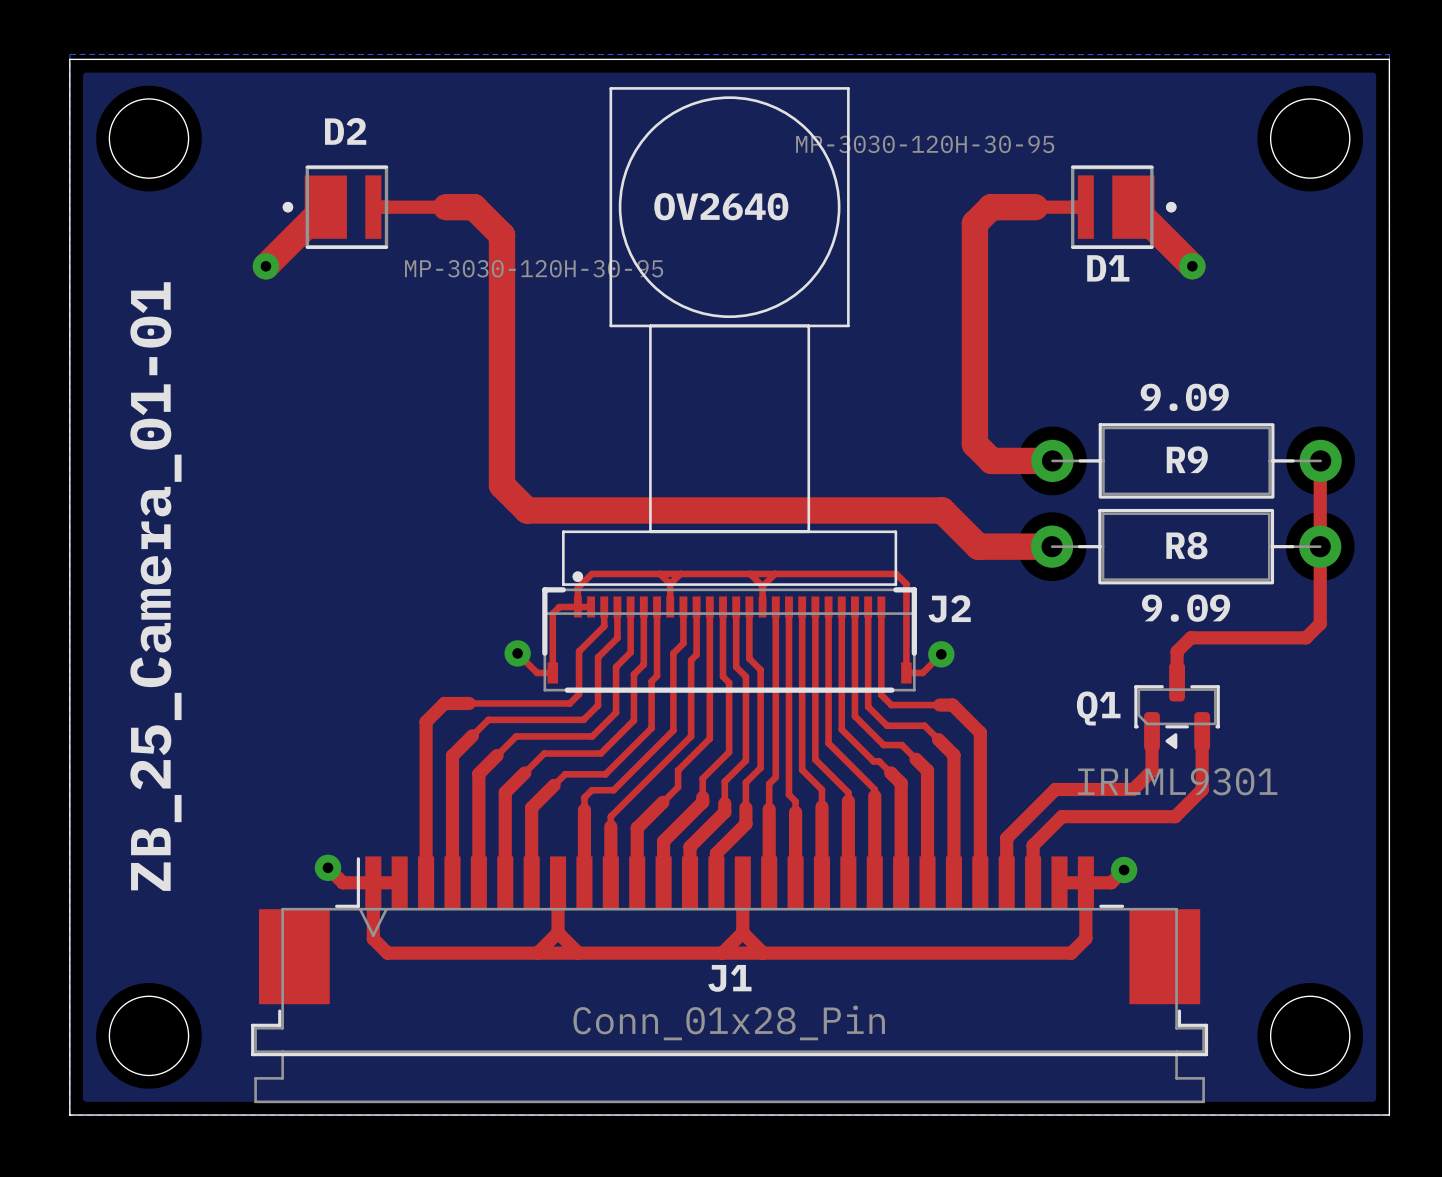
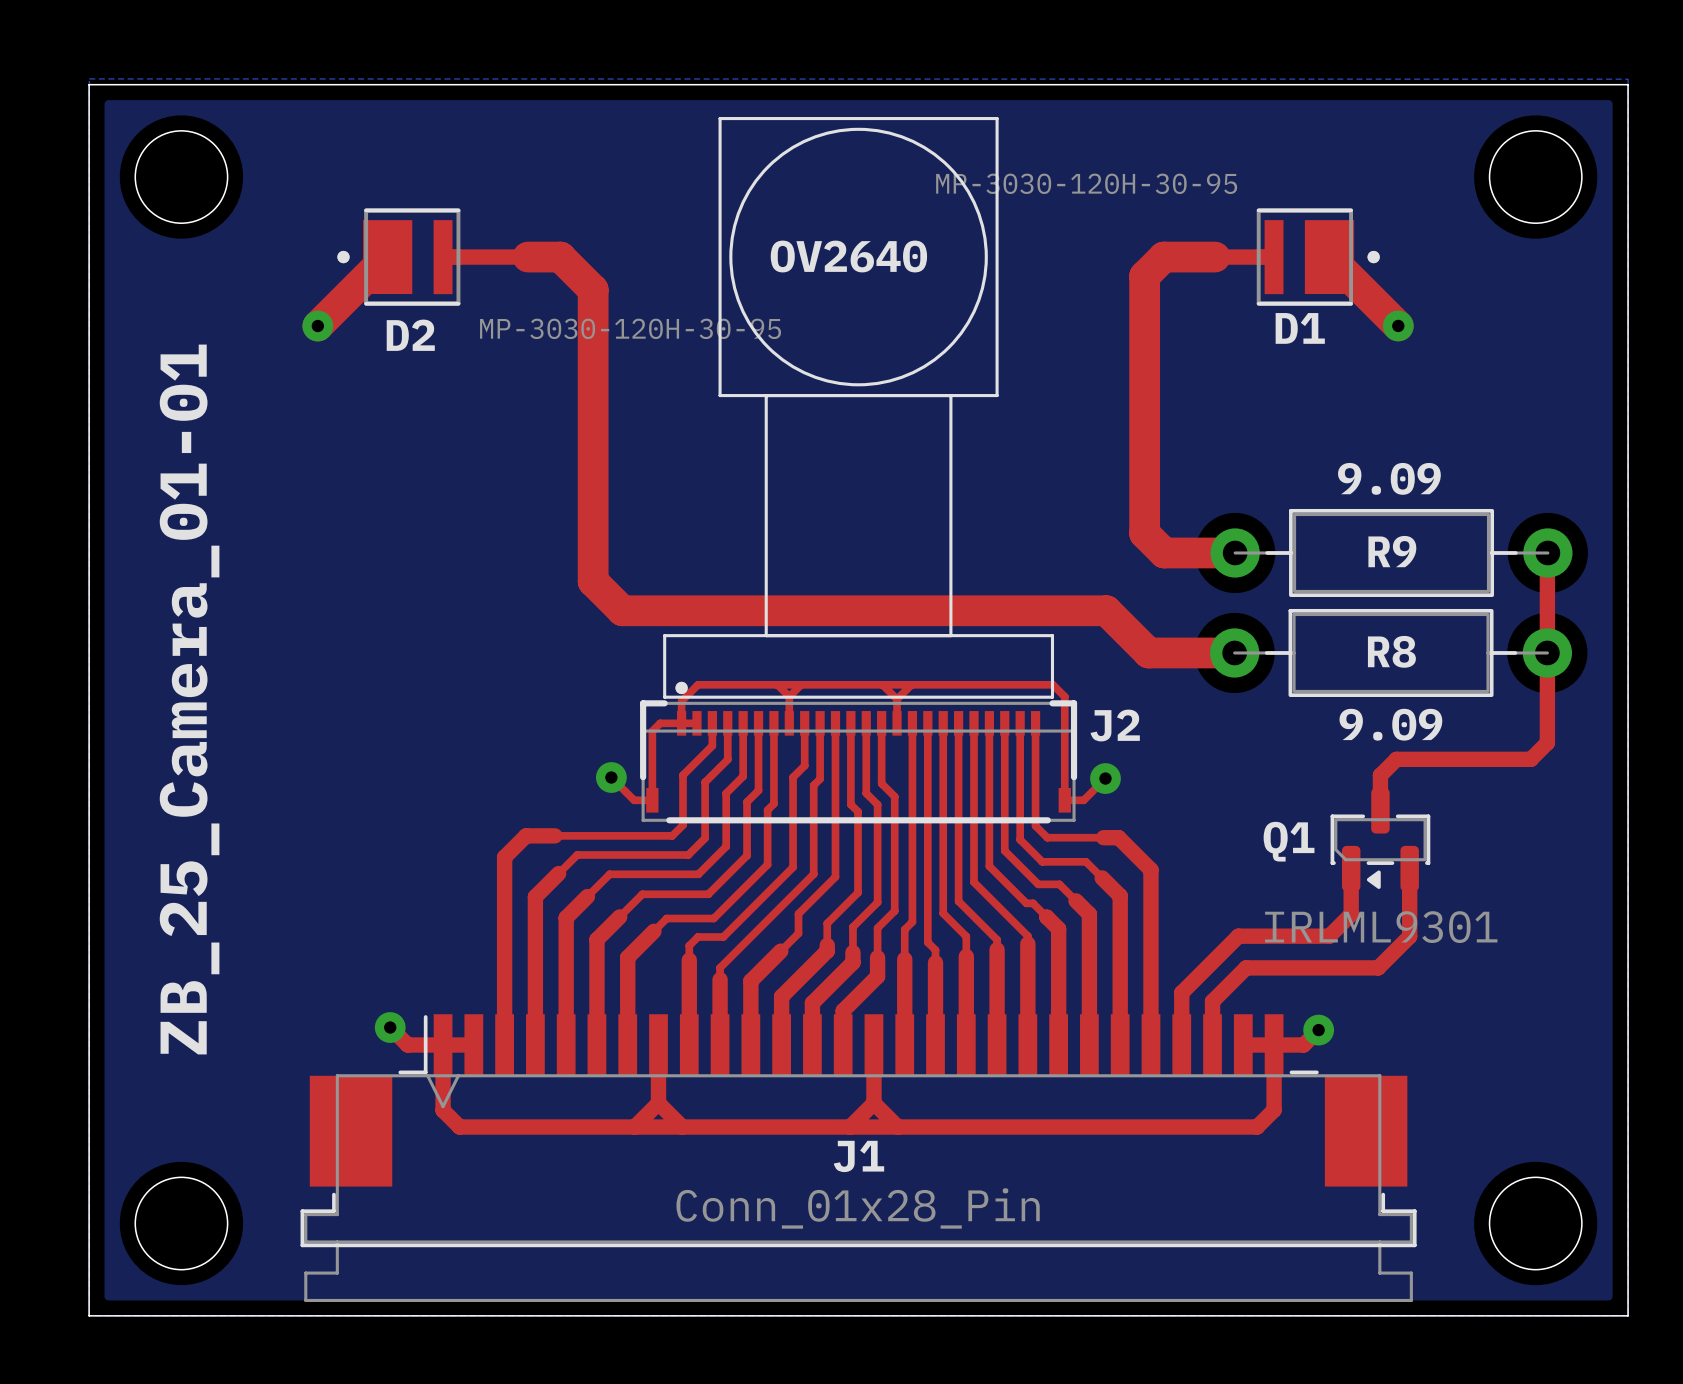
D2 name position: D2 (345, 131) -> D2 (410, 335)

